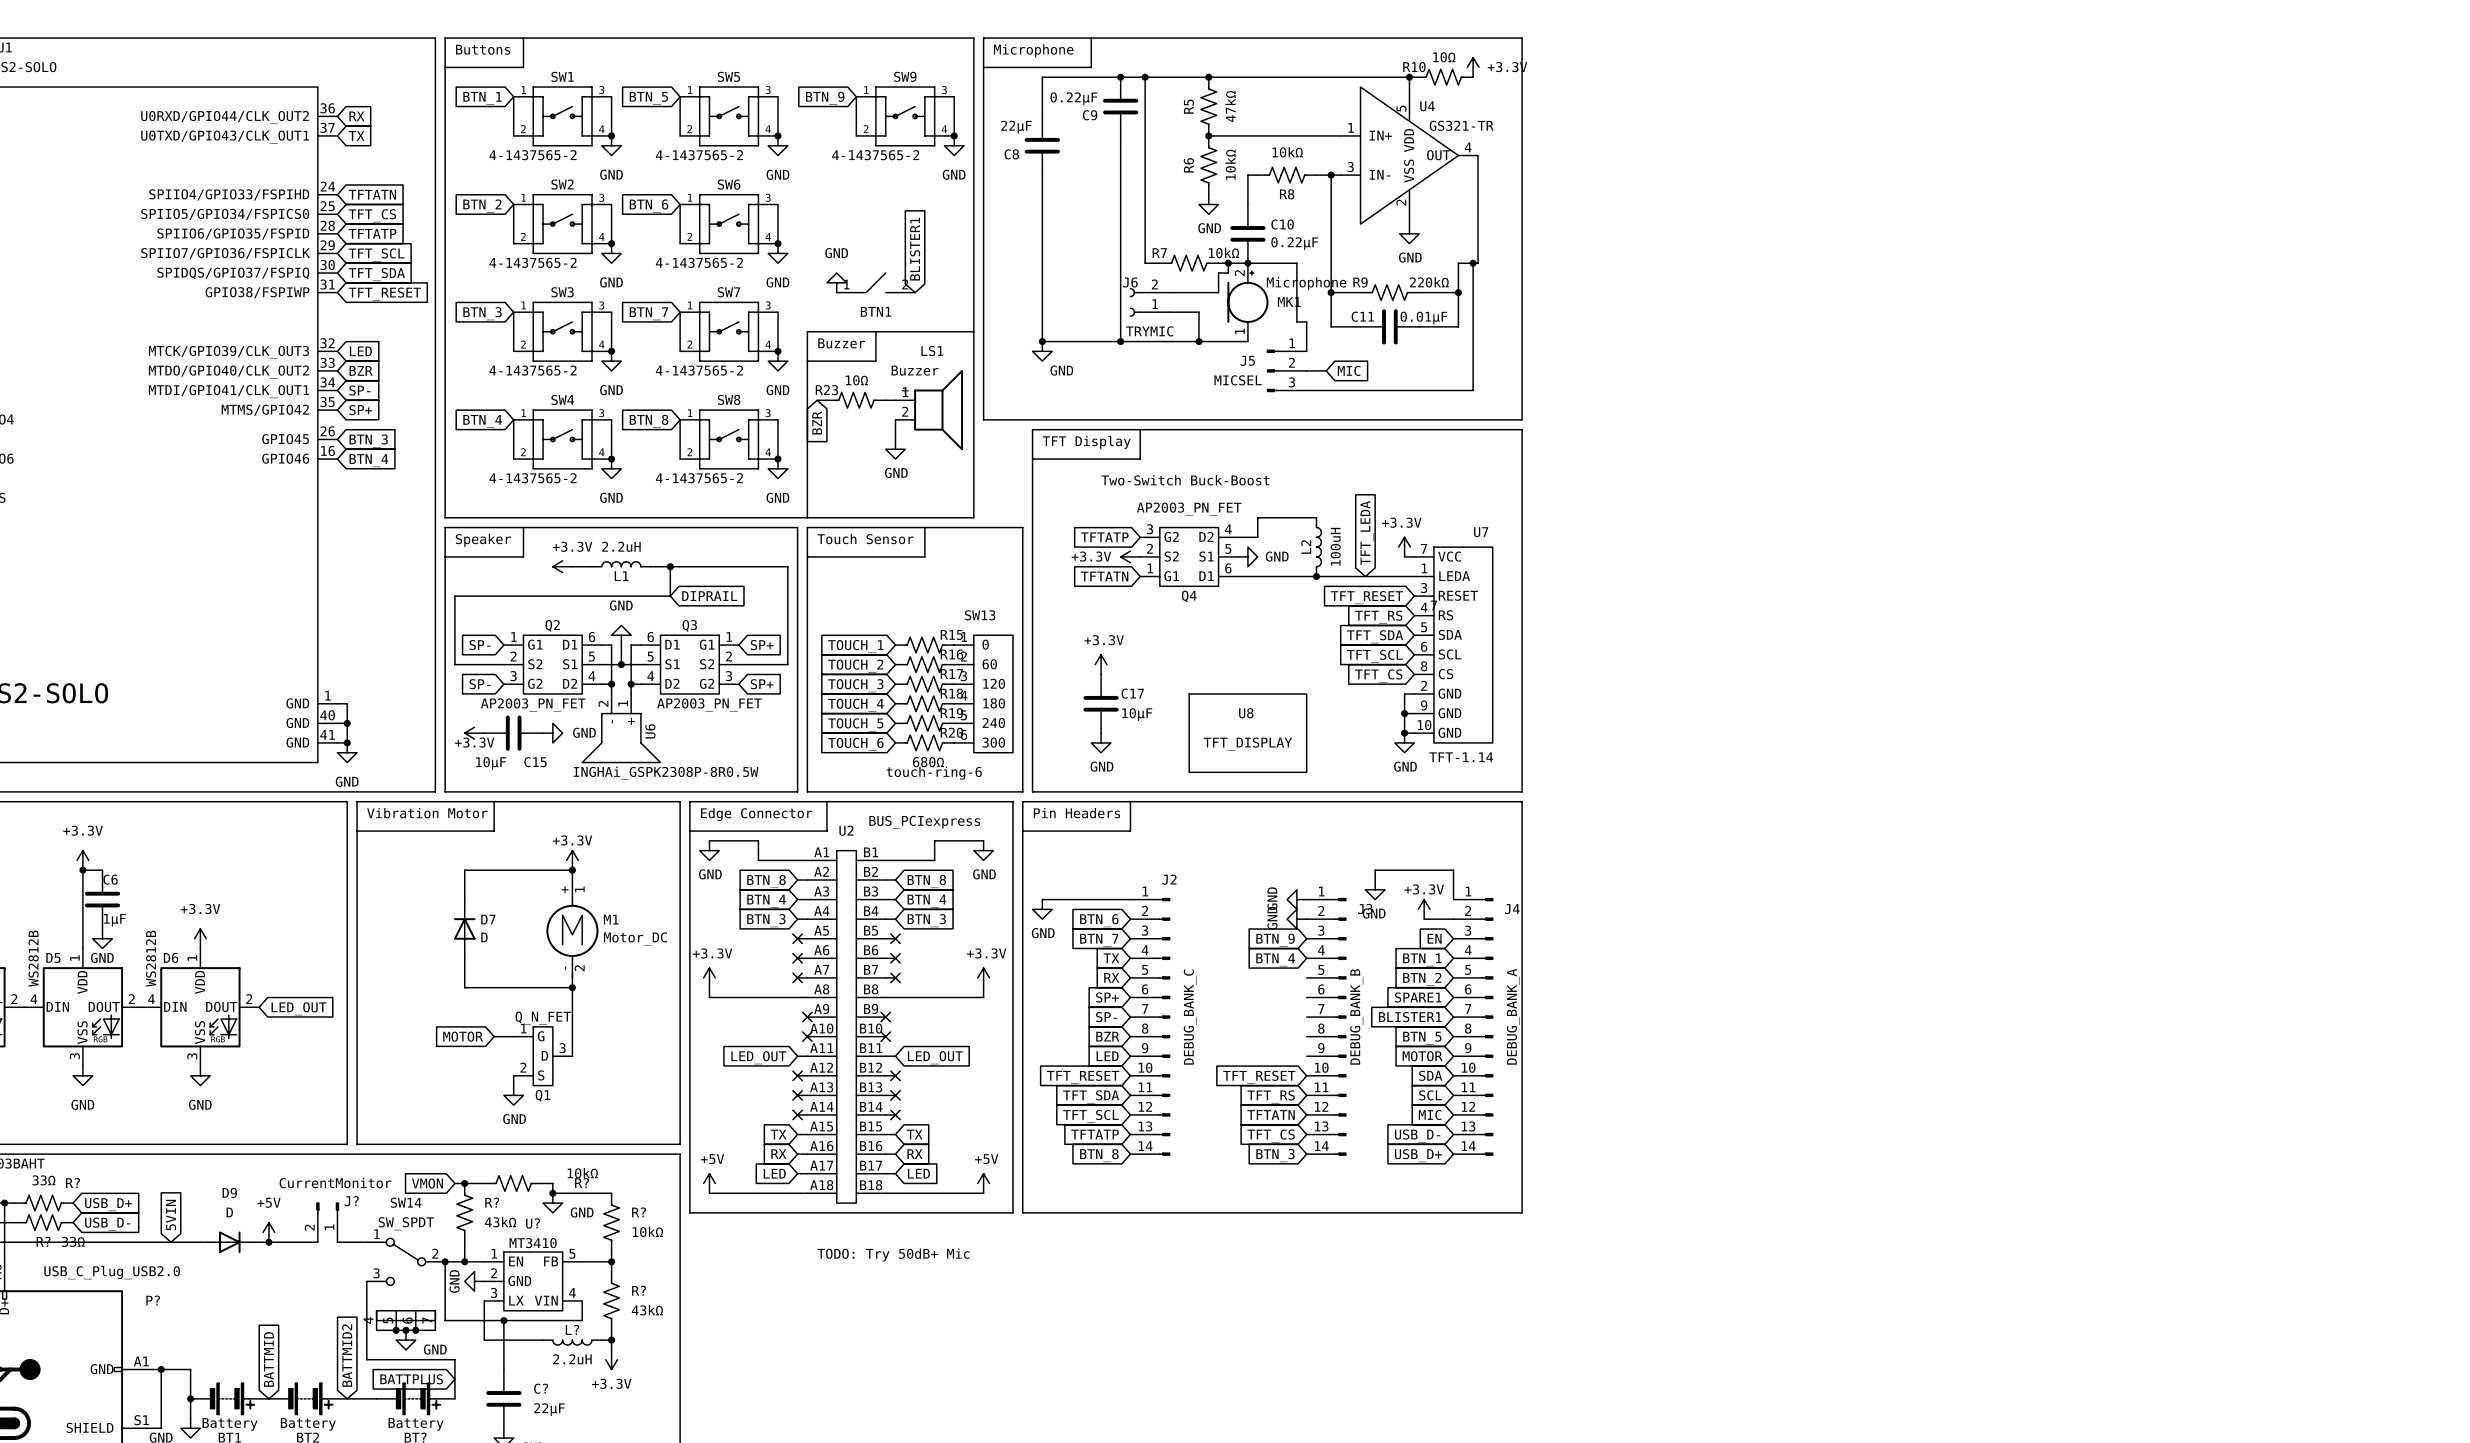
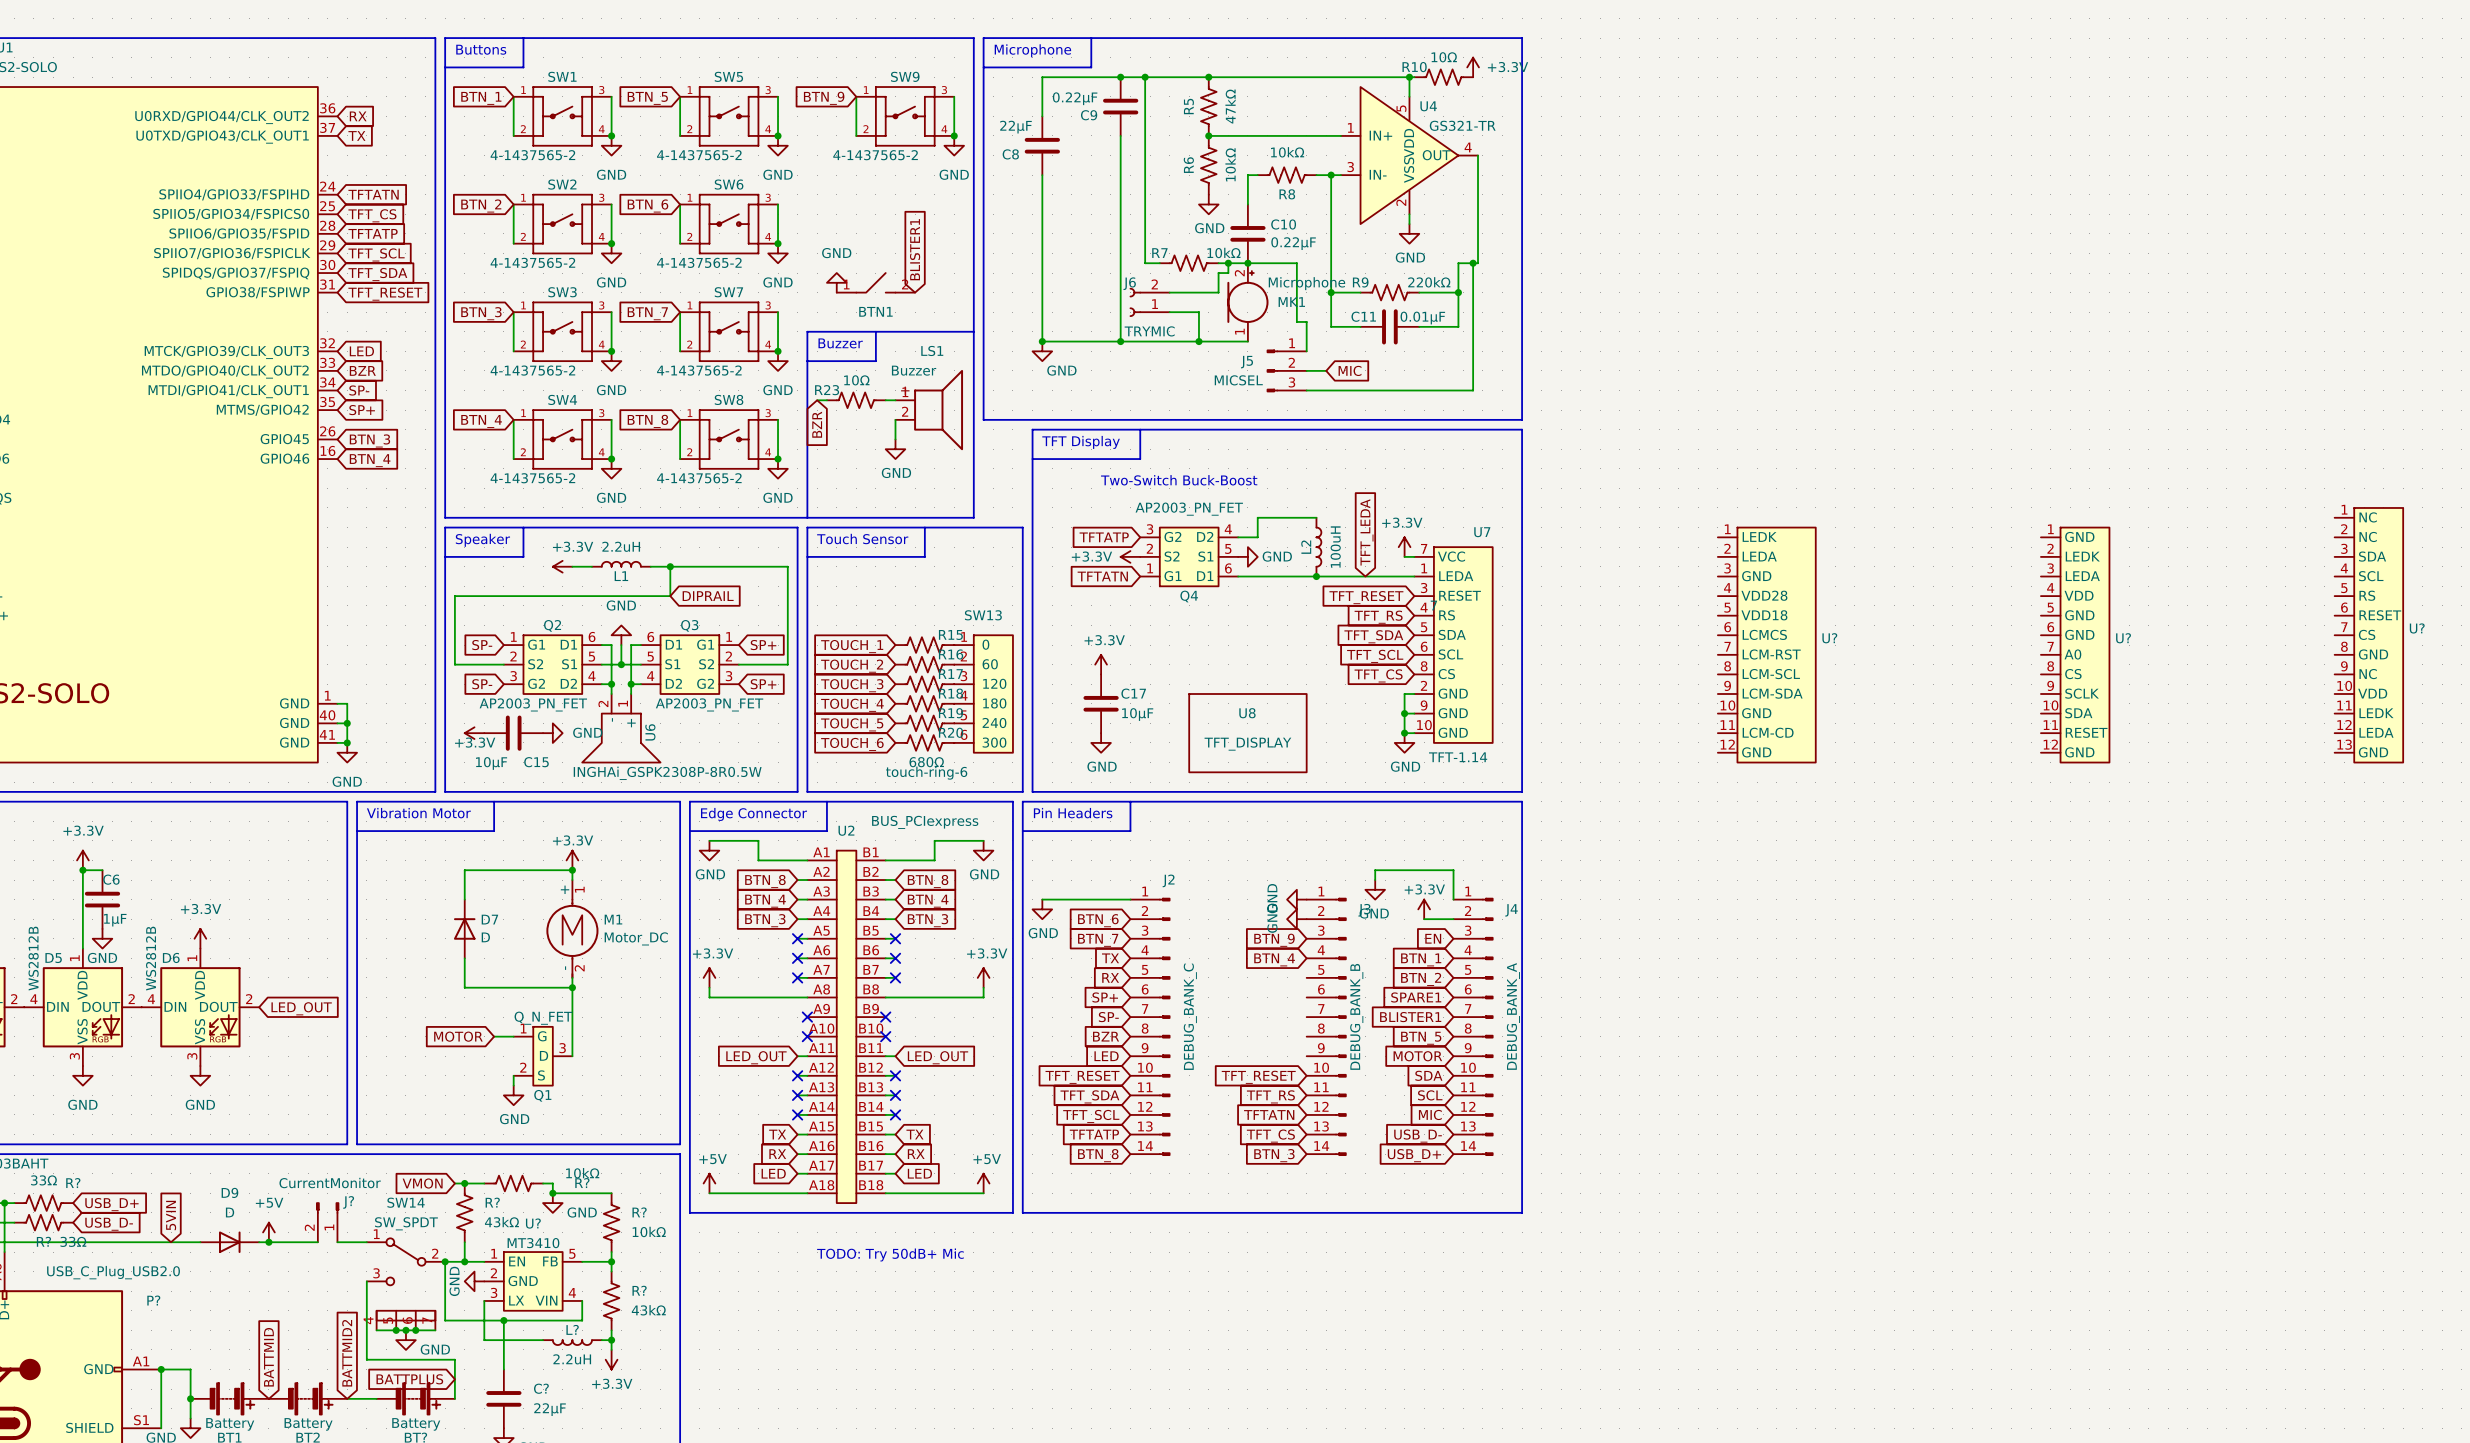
U?: none -> (2369, 635)
U?: none -> (1767, 645)
U?: none -> (2075, 645)

